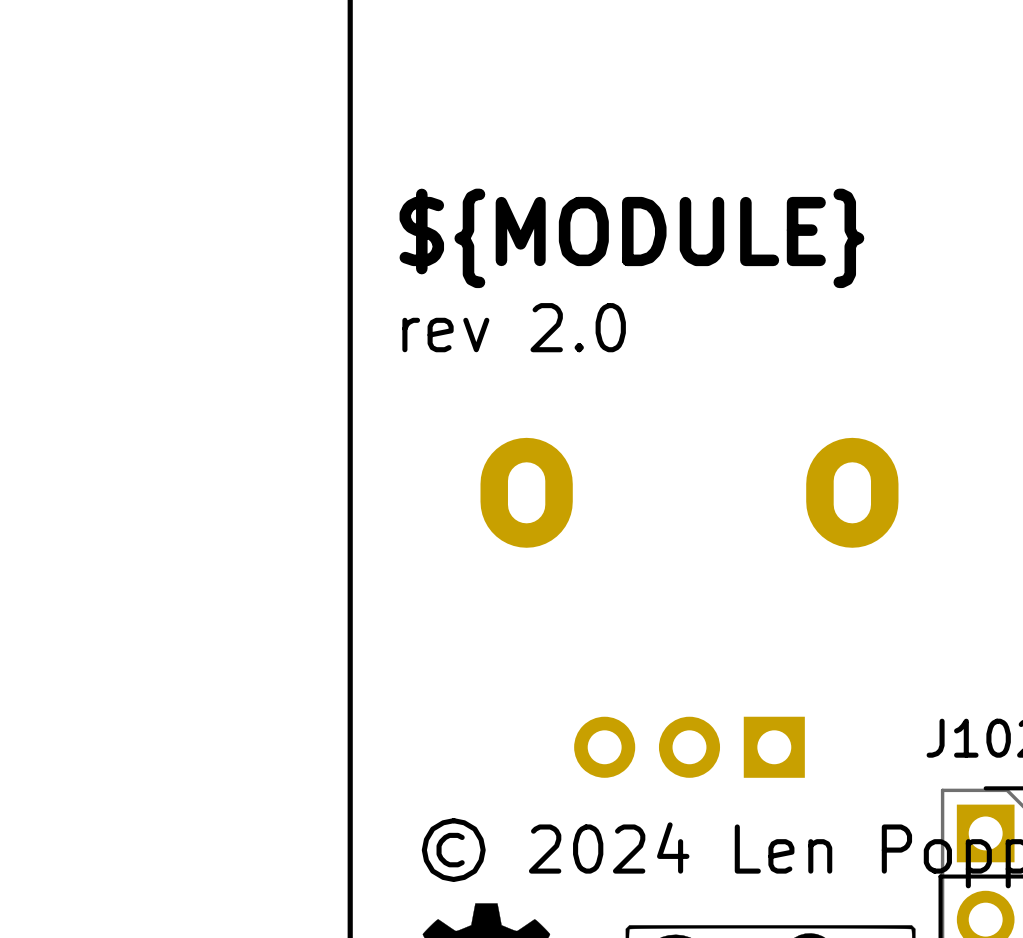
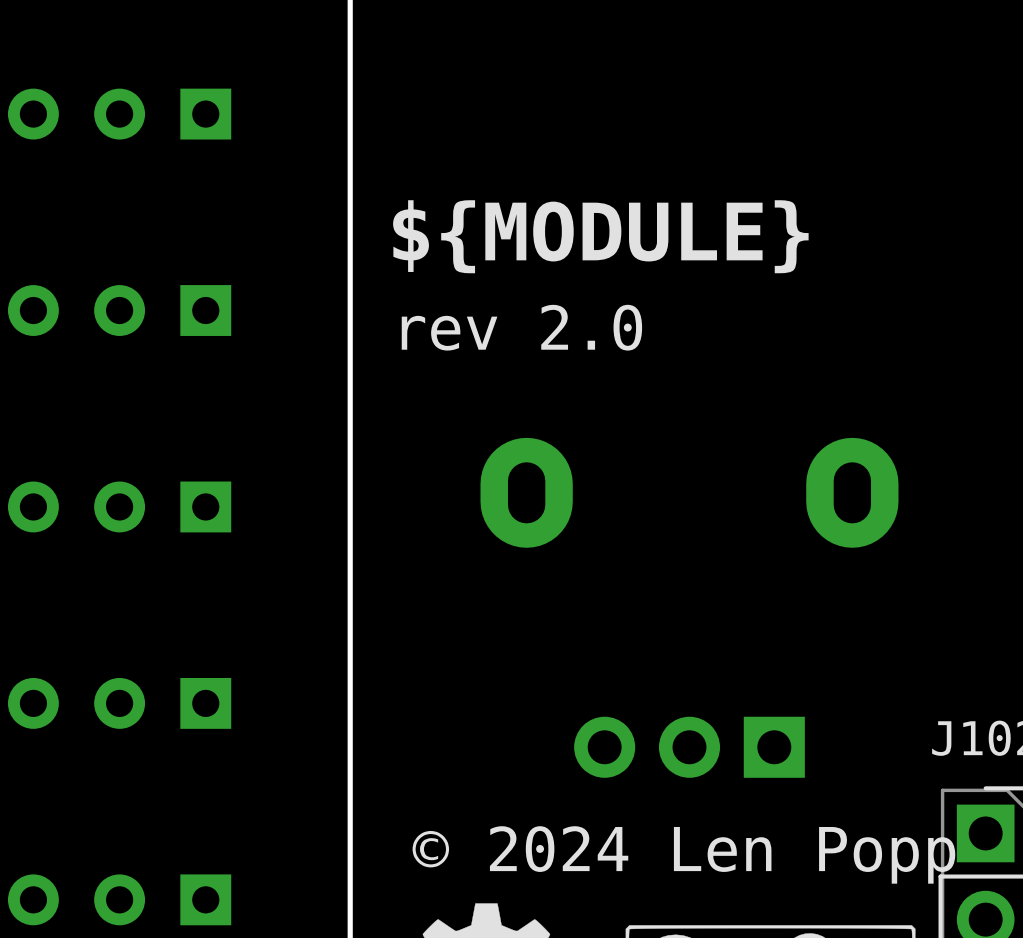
part: none -> (119, 114)
part: none -> (119, 310)
part: none -> (119, 506)
part: none -> (119, 703)
part: none -> (119, 899)

